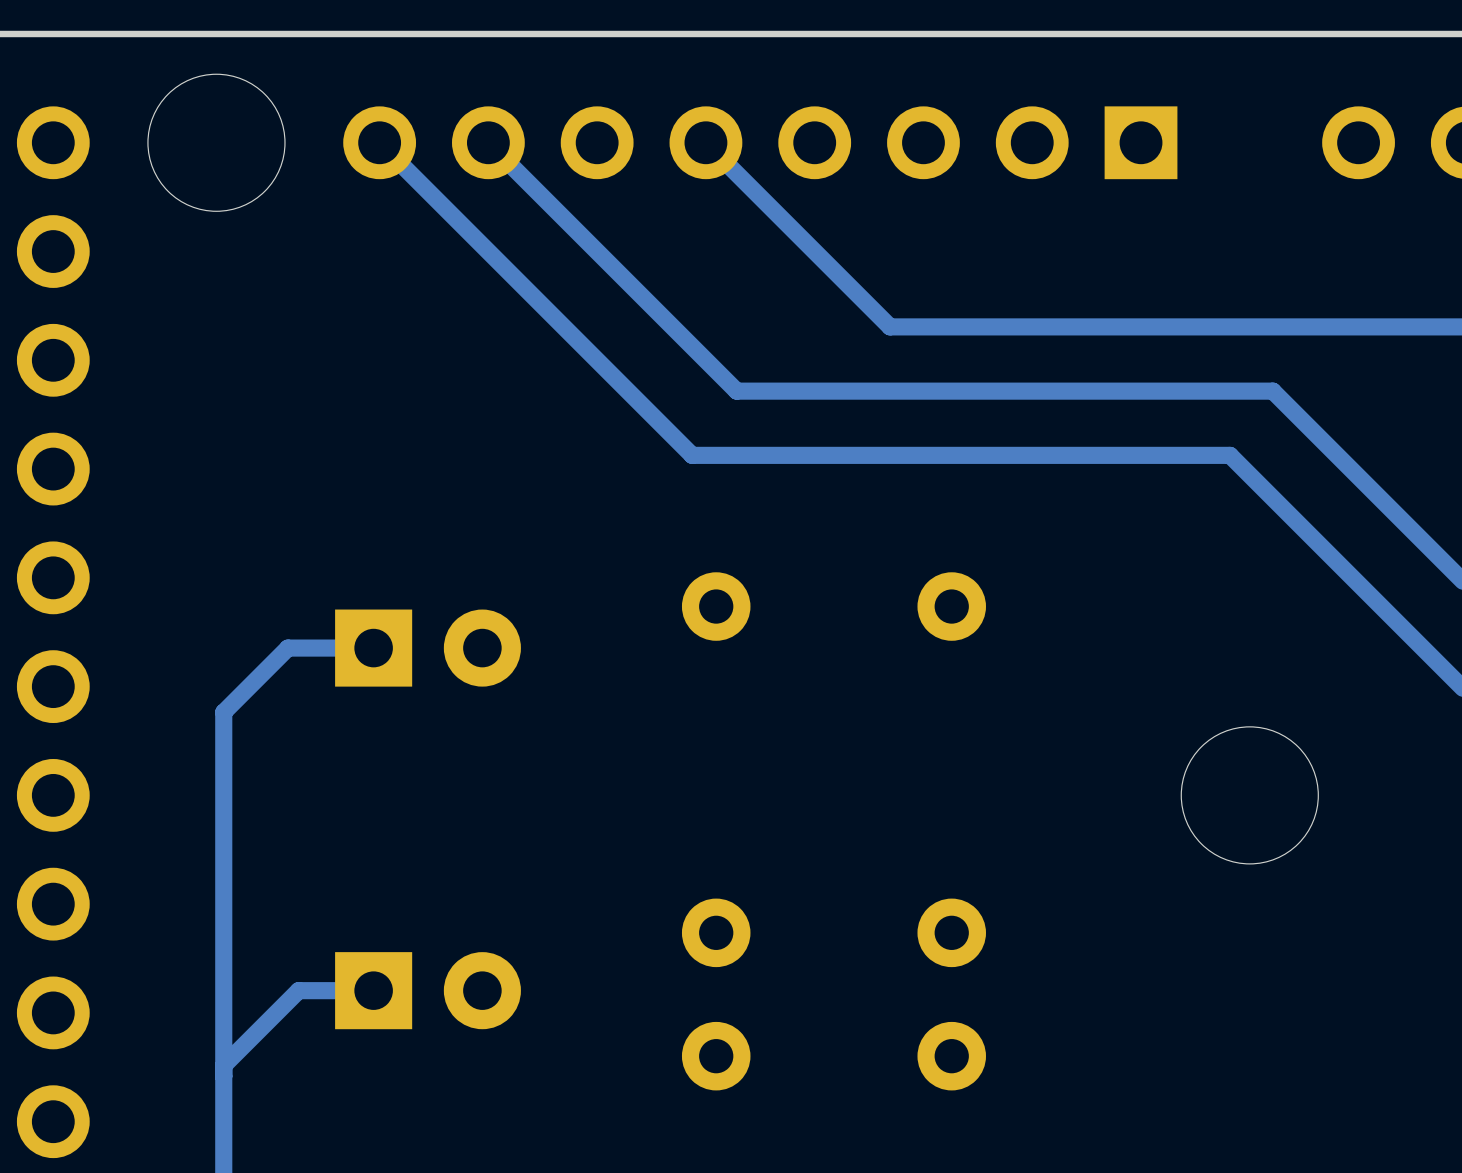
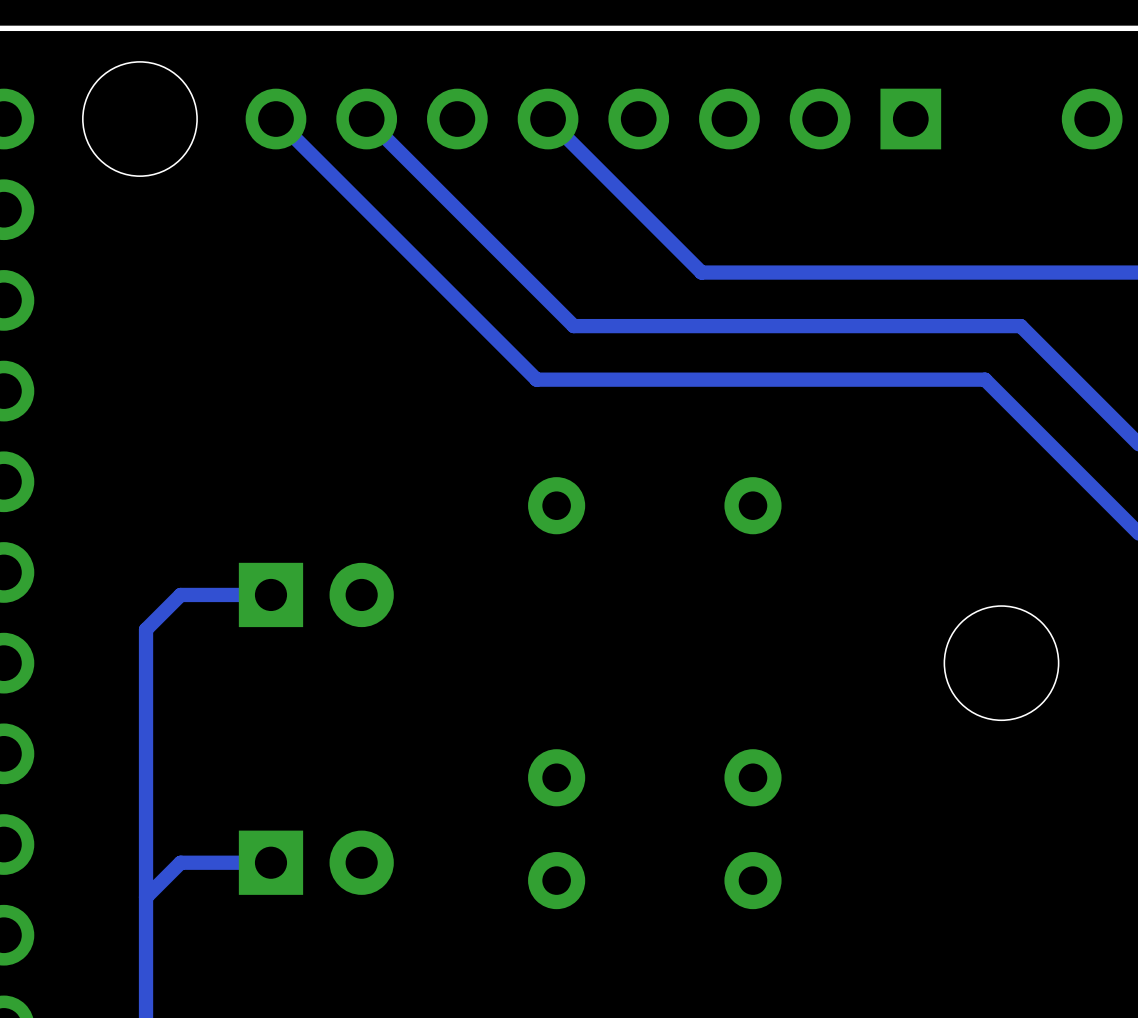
track: (373, 648) (287, 648) (223, 712) (223, 755) -> (270, 594) (180, 594) (146, 629)
part position: (428, 648) -> (316, 594)
track: (373, 990) (298, 990) (223, 1065) -> none
part position: (428, 990) -> (316, 862)
track: none -> (270, 862) (180, 862) (146, 897)

